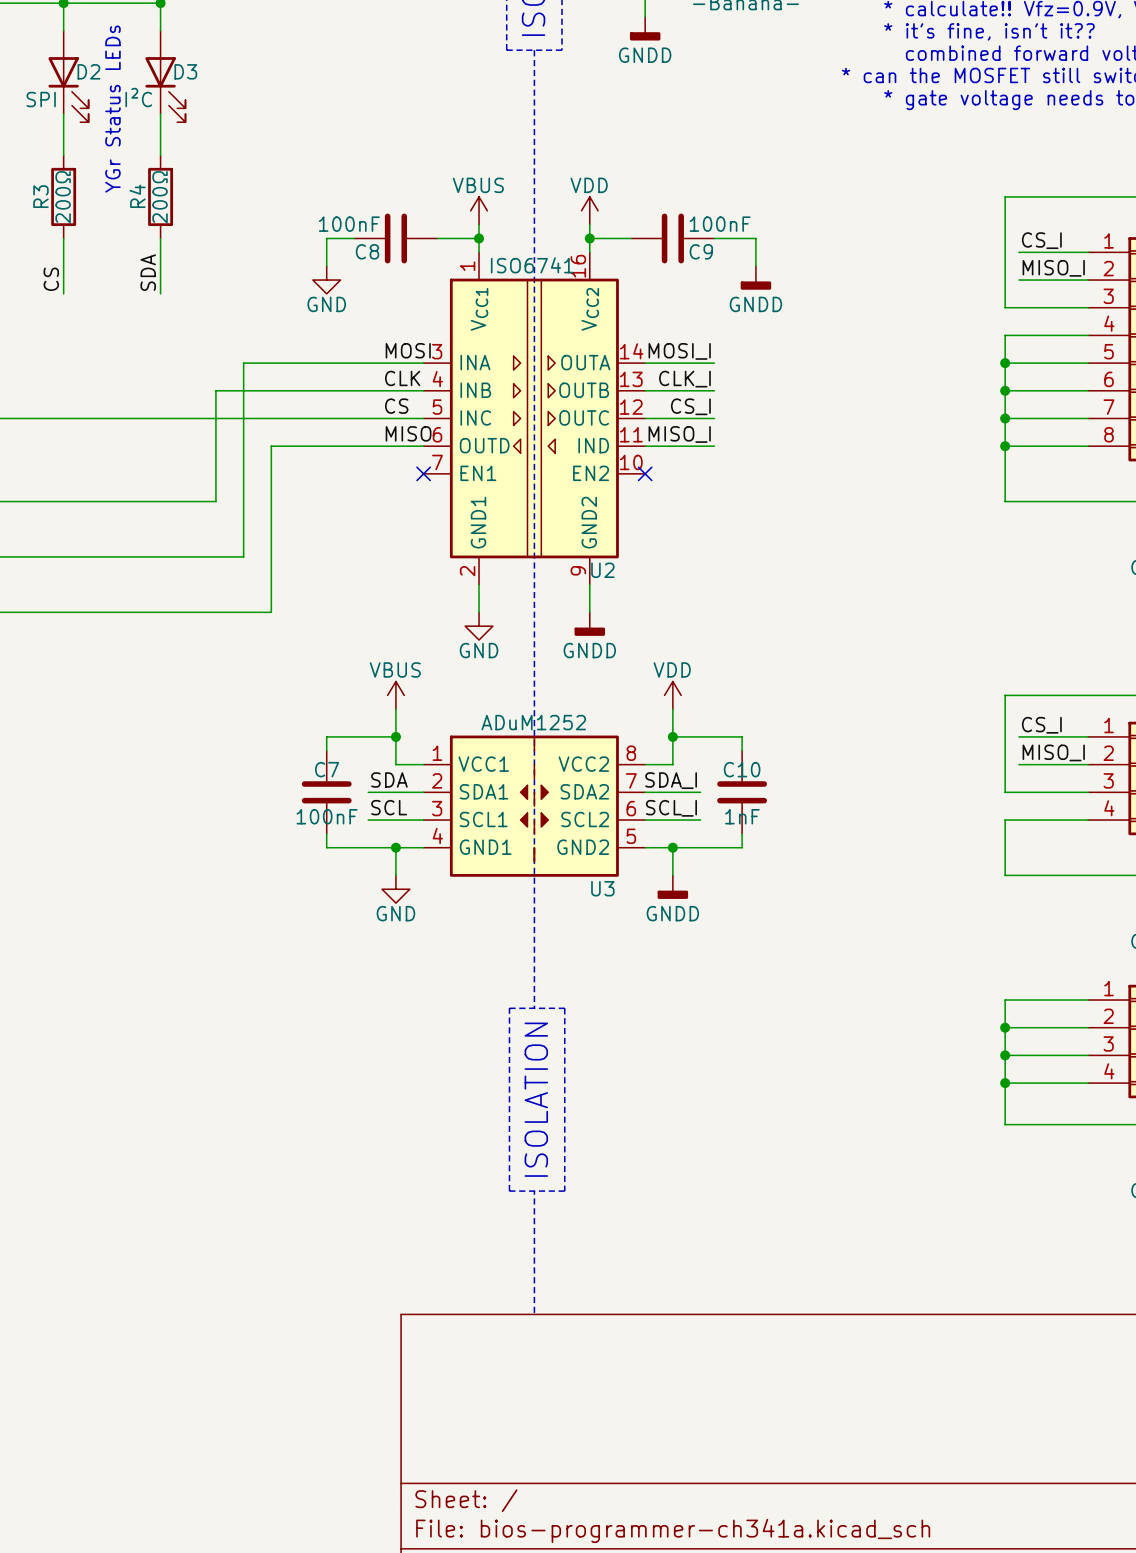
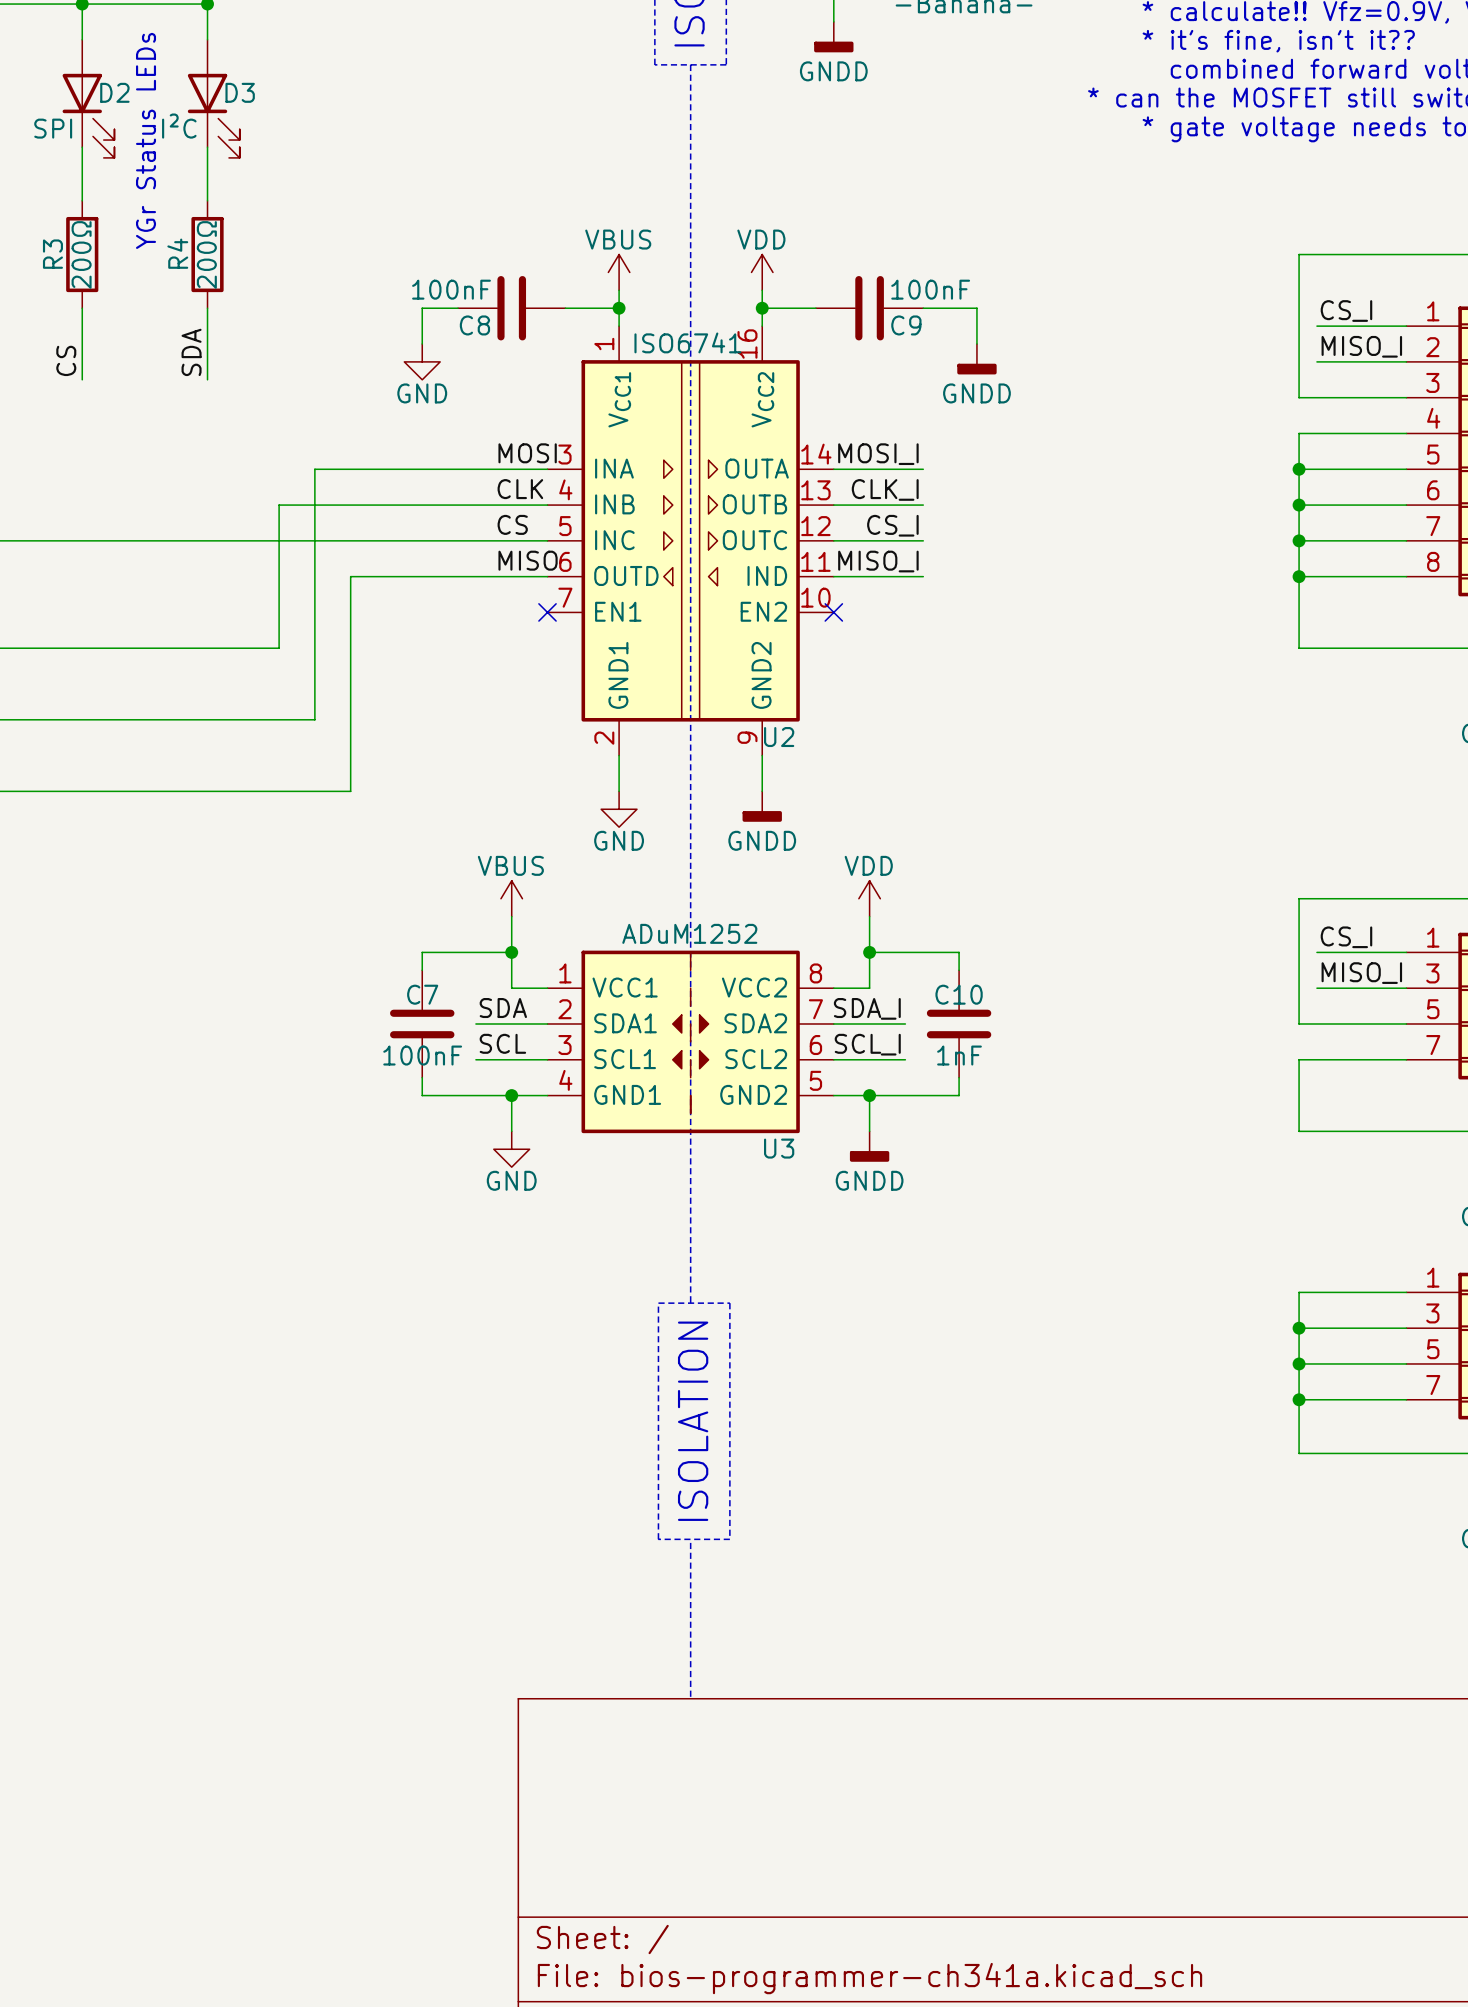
part pin number: 2 (1108, 753) -> 3 (1432, 973)
part pin number: 3 (1108, 780) -> 5 (1433, 1009)
part pin number: 4 (1109, 808) -> 7 (1433, 1045)
part pin number: 2 (1108, 1016) -> 3 (1432, 1313)
part pin number: 3 (1108, 1043) -> 5 (1433, 1349)
part pin number: 4 (1109, 1071) -> 7 (1433, 1385)

